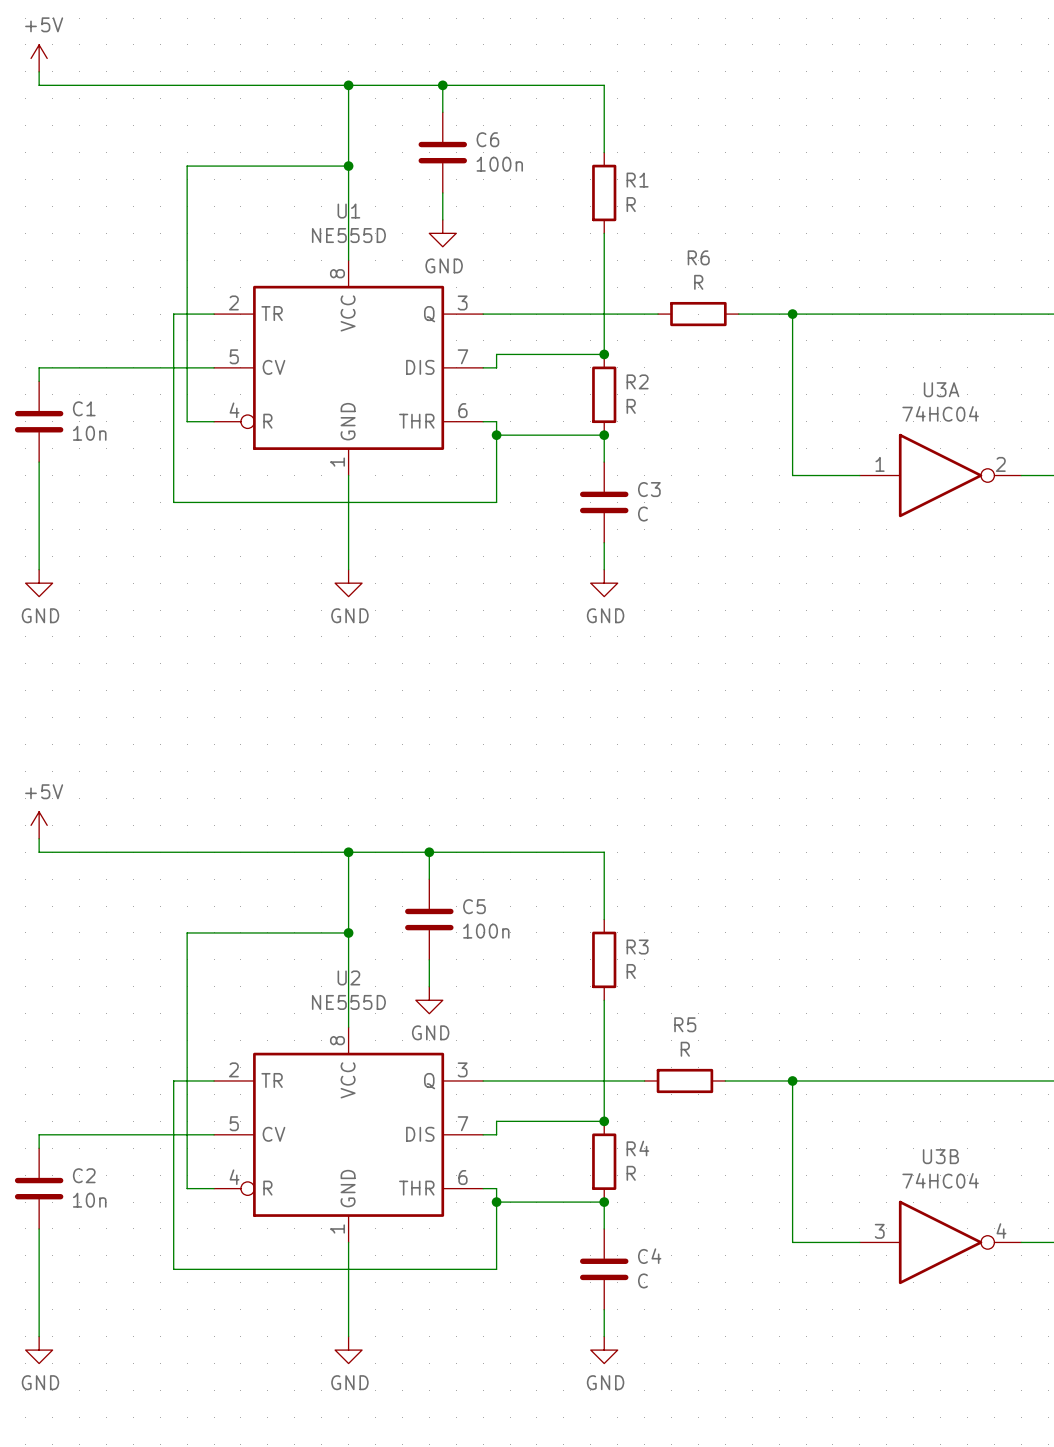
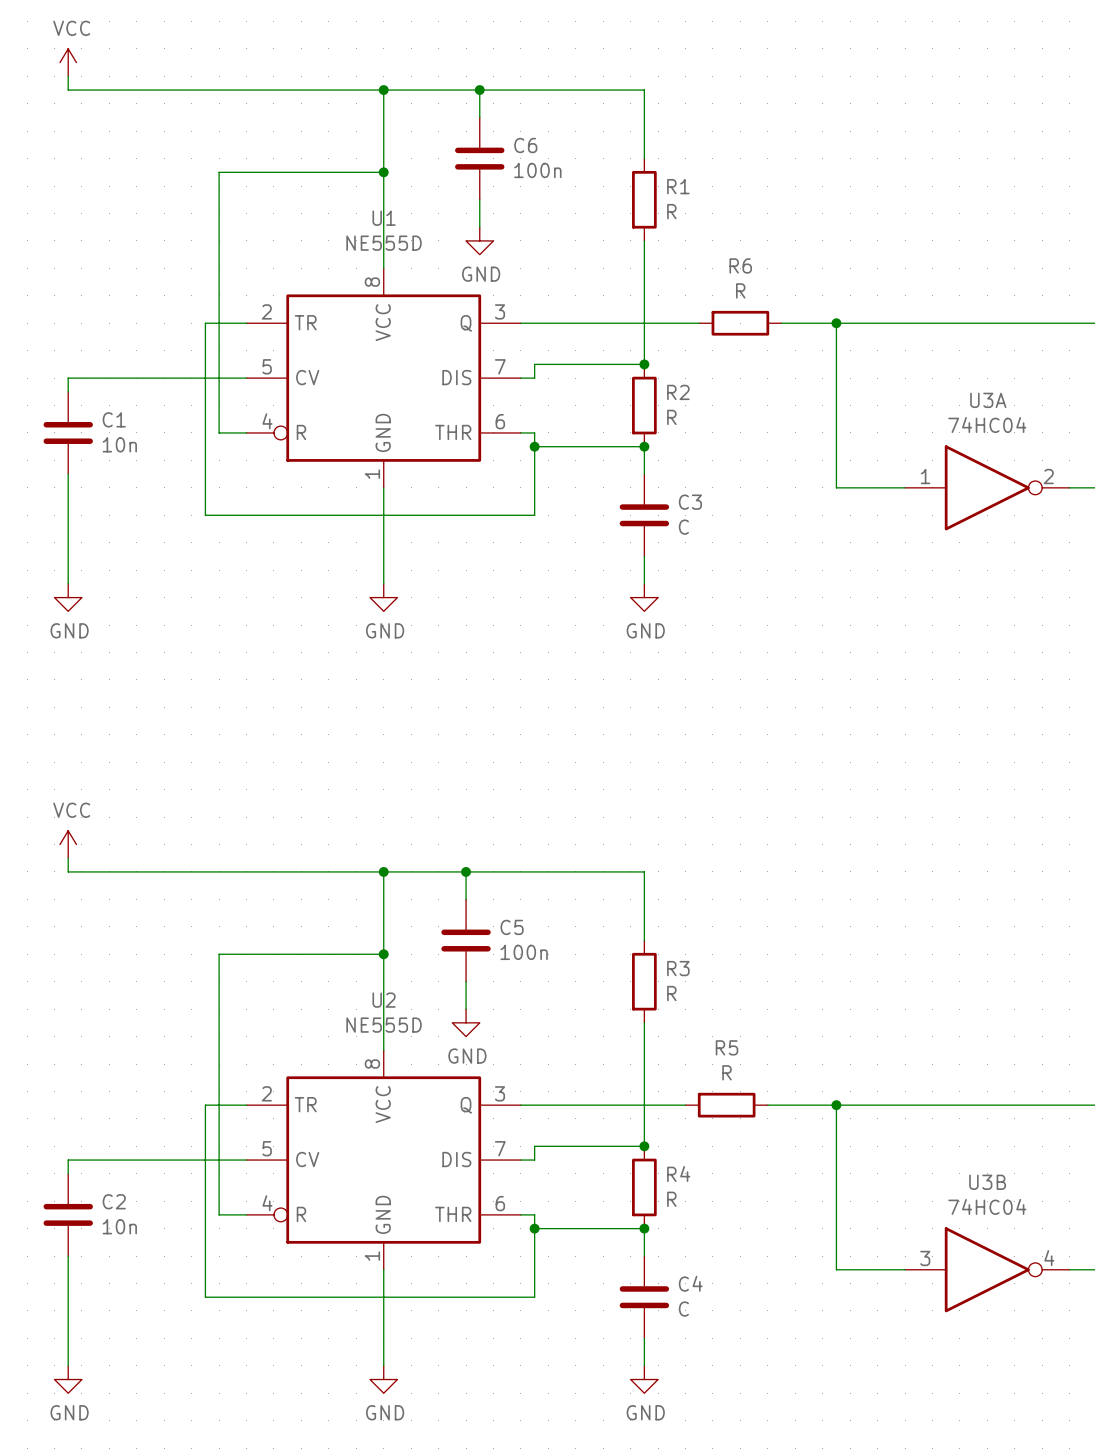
power symbol: +5V (39, 58) -> VCC (68, 62)
power symbol: +5V (39, 825) -> VCC (68, 844)

